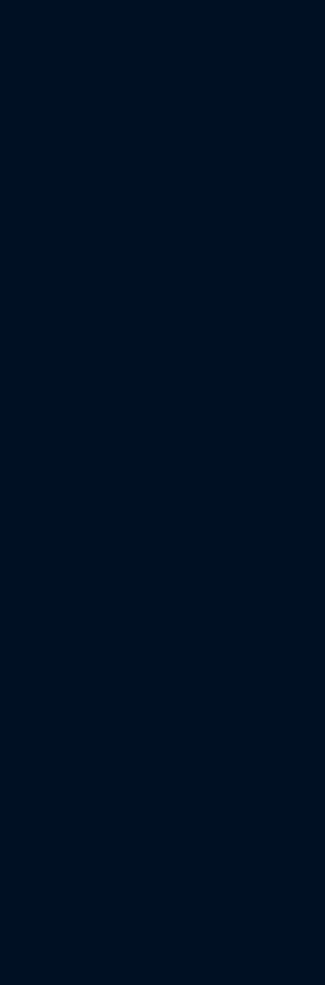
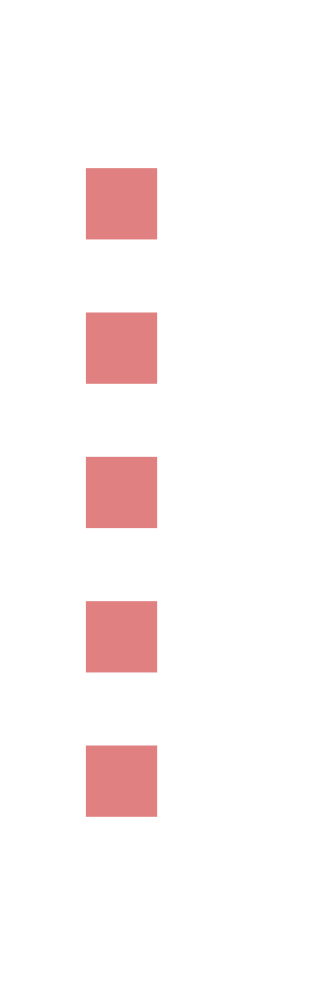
part: none -> (121, 203)
part: none -> (121, 348)
part: none -> (121, 492)
part: none -> (121, 636)
part: none -> (121, 781)

